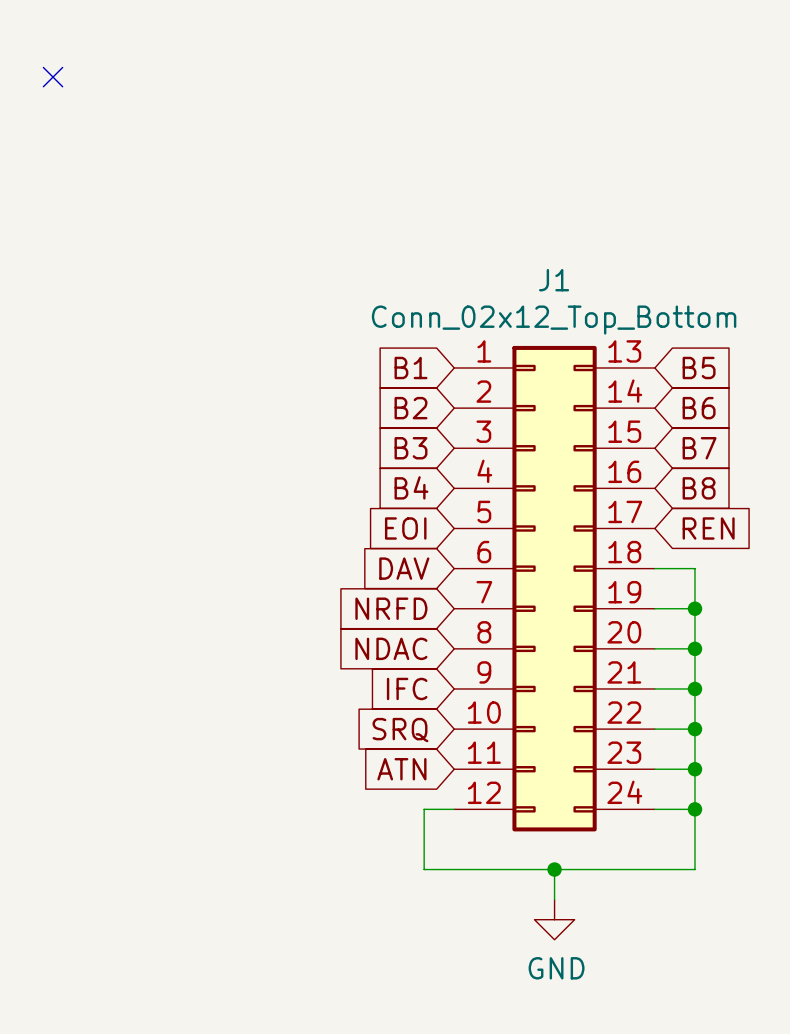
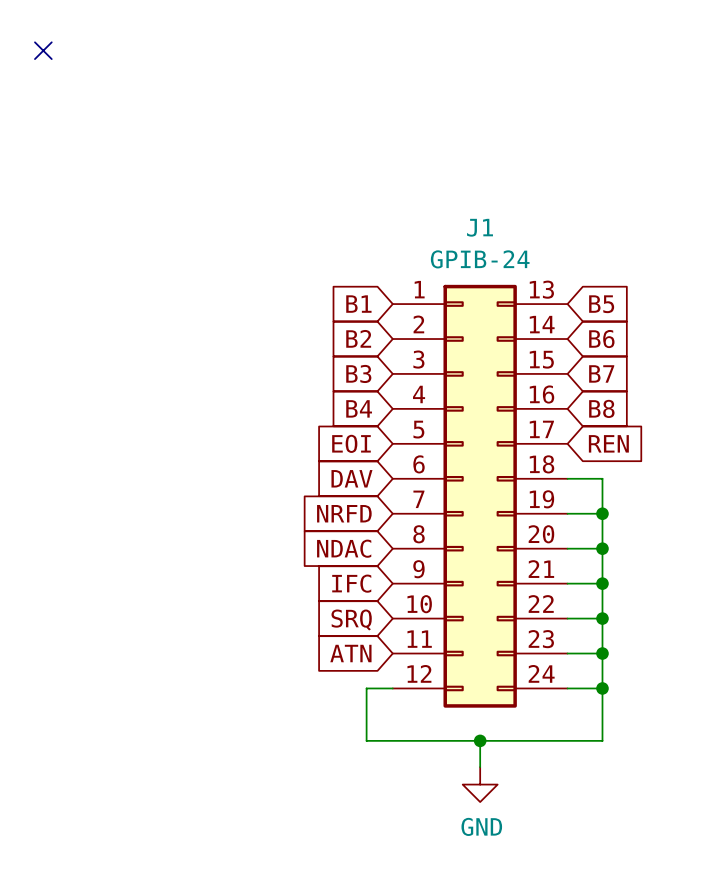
J1 value: Conn_02x12_Top_Bottom (554, 320) -> GPIB-24 (480, 259)

